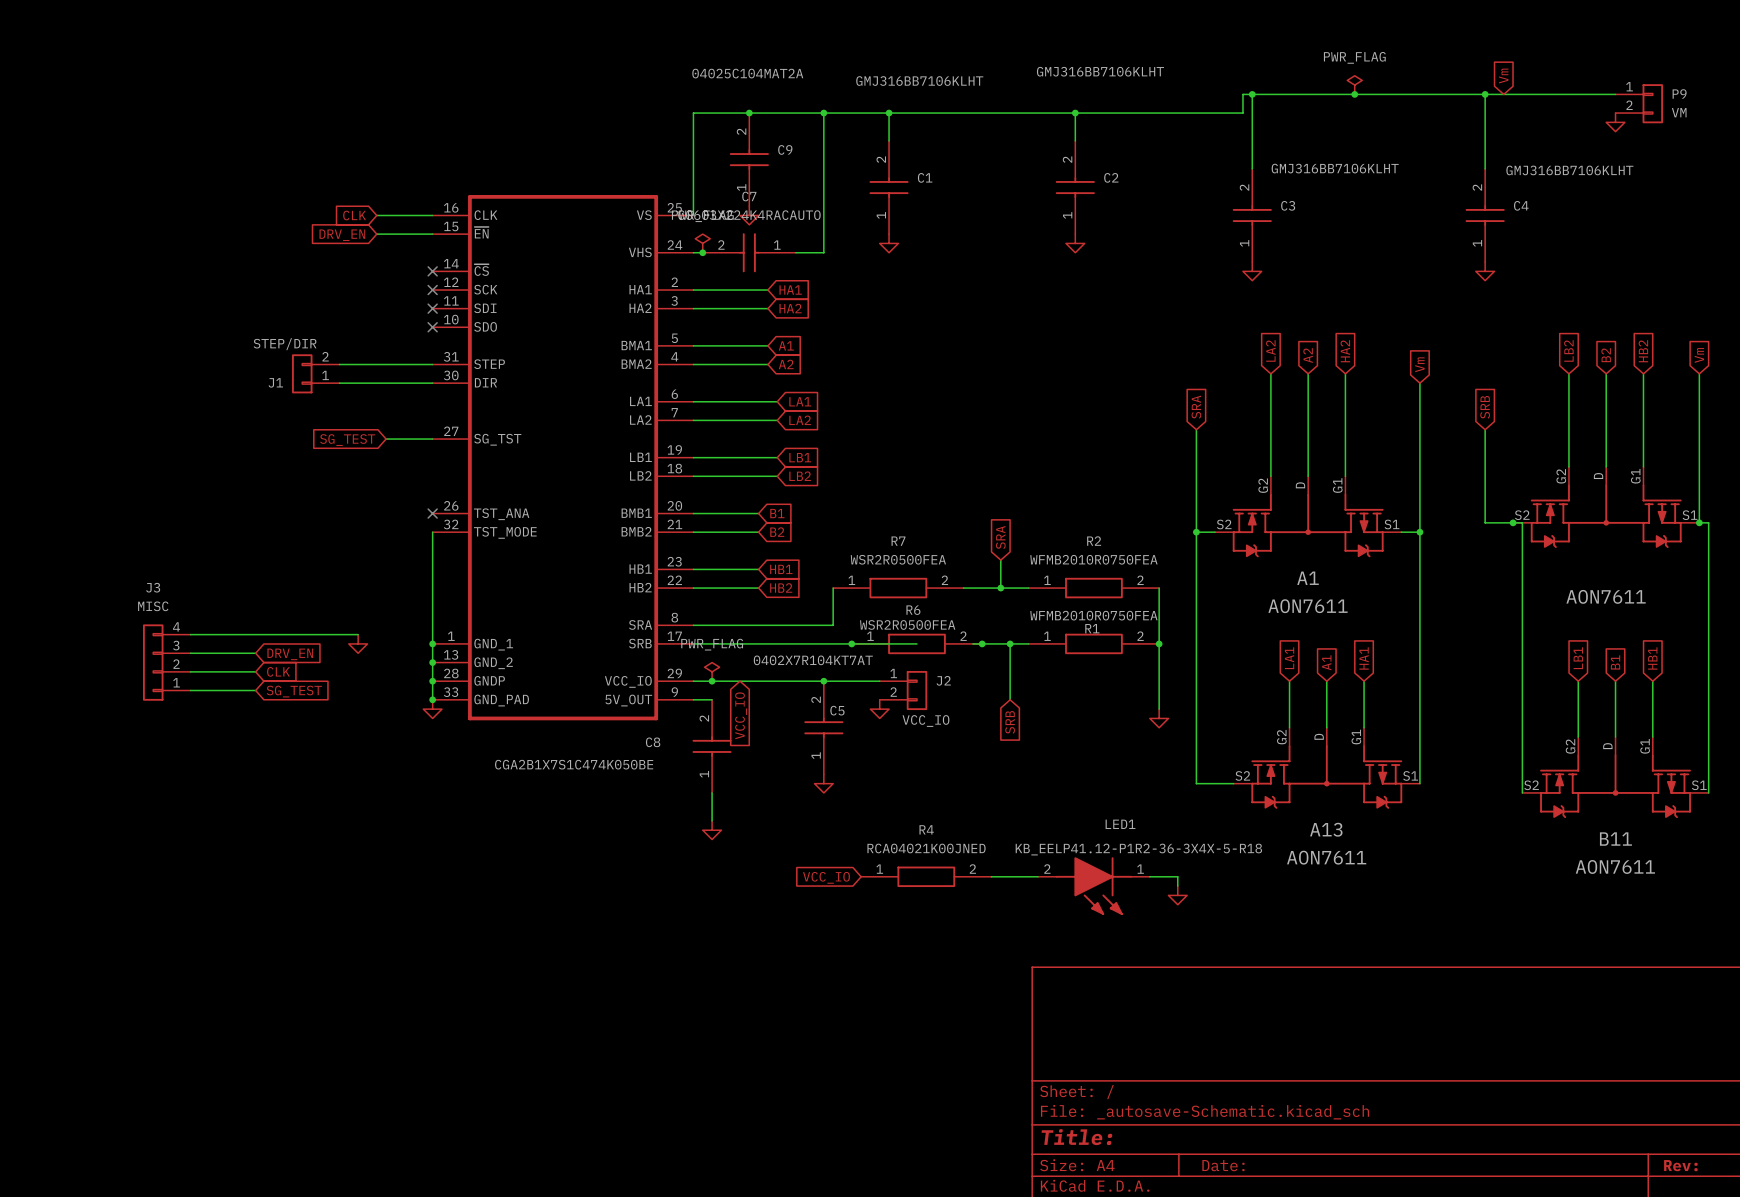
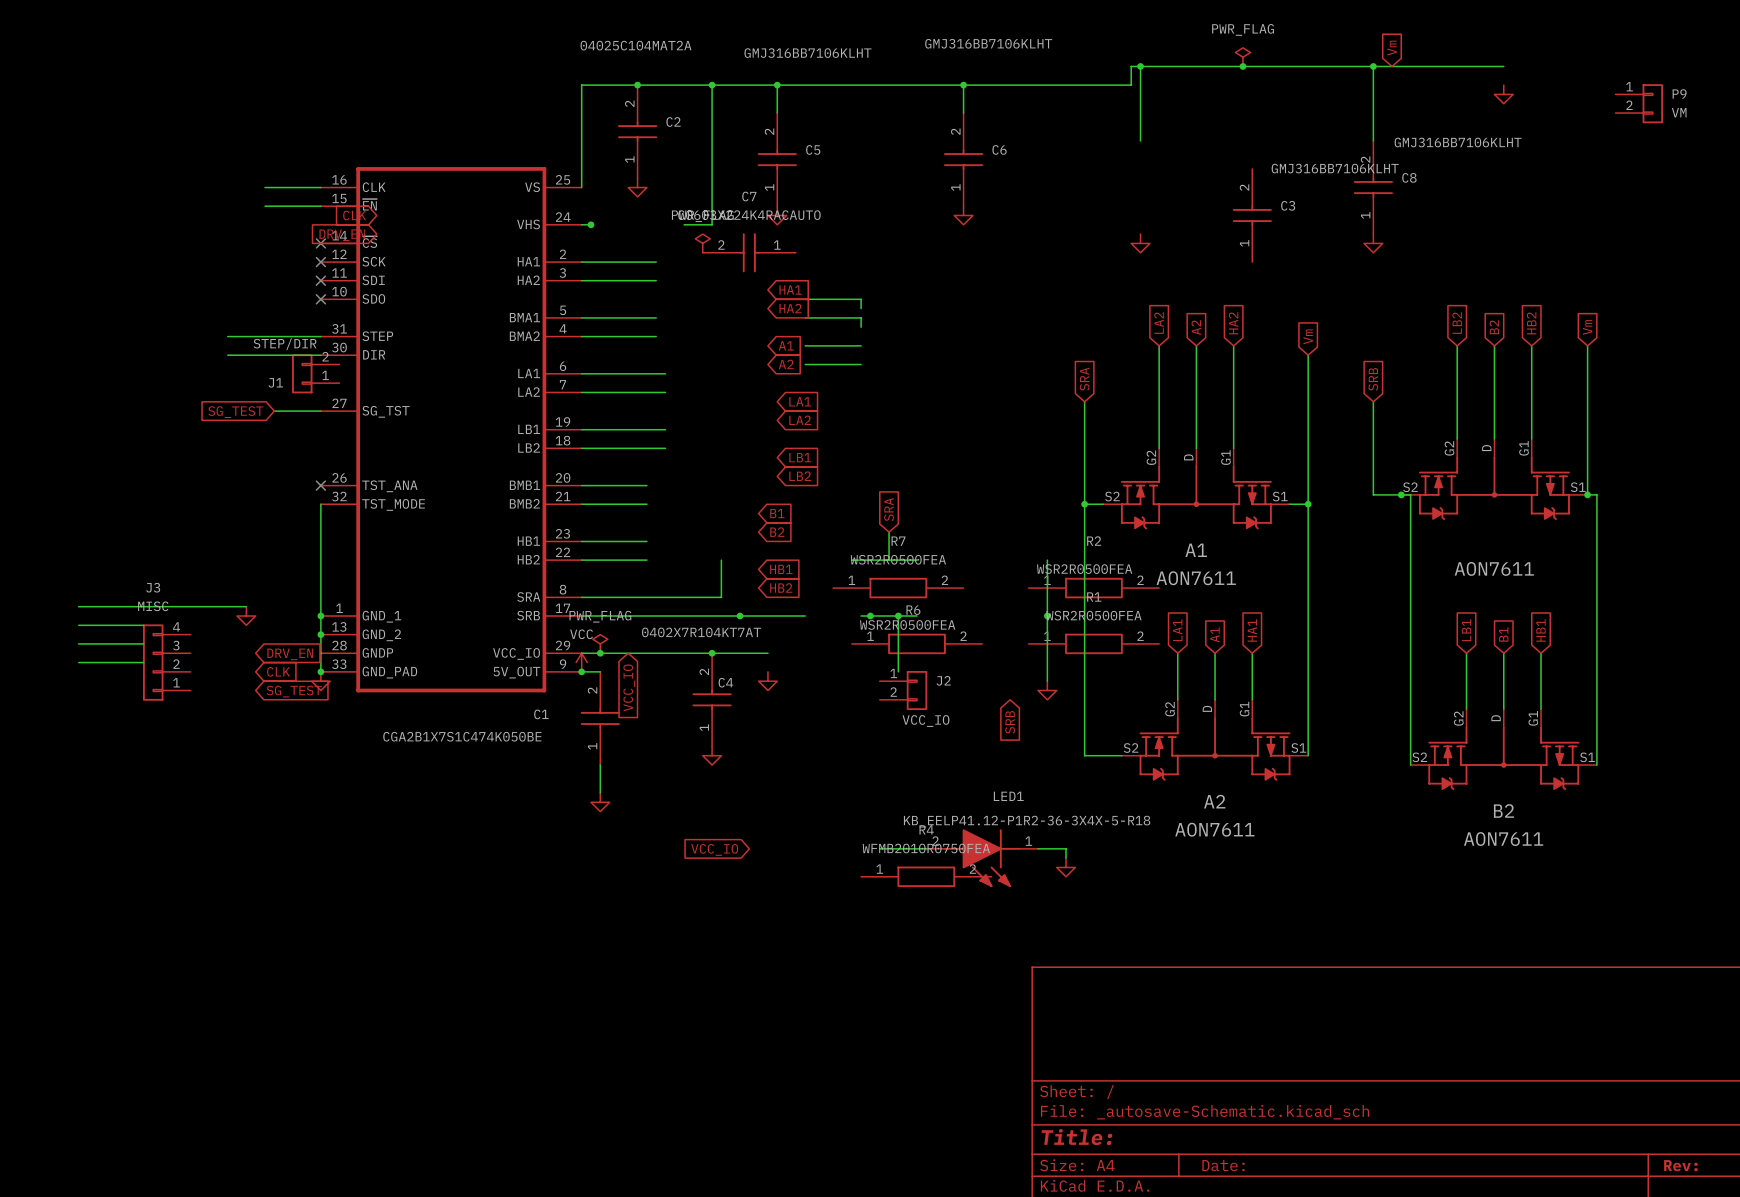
junction: none -> (1140, 66)
C2 value: GMJ316BB7106KLHT (1100, 71) -> 04025C104MAT2A (636, 45)
global label position: Vm (1503, 76) -> Vm (1392, 48)
C1 value: GMJ316BB7106KLHT (919, 81) -> CGA2B1X7S1C474K050BE (462, 736)
junction: none -> (637, 85)
junction: none -> (712, 85)
junction: none -> (777, 85)
junction: none -> (963, 85)
power symbol position: PWR_FLAG (1354, 85) -> PWR_FLAG (1242, 57)
wire: (1252, 94) (1252, 168) -> (1140, 66) (1140, 140)
junction position: (1252, 94) -> (1242, 66)
junction position: (1354, 94) -> (1373, 66)
wire: (1485, 94) (1485, 168) -> (1373, 66) (1373, 140)
junction: (1485, 94) -> none
power symbol: none -> (1503, 94)
wire: (1615, 94) (1242, 94) (1242, 113) (693, 113) (693, 215) -> (1503, 66) (1131, 66) (1131, 85) (581, 85) (581, 187)
junction: (749, 113) -> none
wire: (823, 113) (823, 252) (795, 252) -> (712, 85) (712, 224) (684, 224)
junction: (823, 113) -> none
wire: (889, 113) (889, 140) -> (777, 85) (777, 113)
junction: (889, 113) -> none
wire: (1075, 113) (1075, 140) -> (963, 85) (963, 113)
junction: (1075, 113) -> none
power symbol: (1615, 122) -> none
C9: 04025C104MAT2A (749, 159) -> none
C6: none -> GMJ316BB7106KLHT (963, 159)
C4 value: GMJ316BB7106KLHT (1569, 170) -> 0402X7R104KT7AT (701, 632)
C1 name position: C1 (925, 177) -> C1 (541, 714)
power symbol: none -> (637, 187)
C1 position: (889, 187) -> (600, 718)
C2 position: (1075, 187) -> (637, 131)
C4 name position: C4 (1521, 205) -> C4 (725, 682)
wire: (376, 215) (432, 215) -> (265, 187) (320, 187)
power symbol position: (749, 215) -> (777, 215)
power symbol: none -> (963, 215)
C4 position: (1485, 215) -> (712, 699)
junction: none -> (590, 224)
wire: (376, 234) (432, 234) -> (265, 206) (320, 206)
no-connect mark: none -> (320, 243)
power symbol: (889, 243) -> none
power symbol: (1075, 243) -> none
power symbol: none -> (1140, 243)
power symbol: none -> (1373, 243)
wire: (693, 252) (702, 252) -> (581, 224) (590, 224)
junction: (702, 252) -> none
no-connect mark: none -> (320, 262)
no-connect mark: (432, 271) -> none
power symbol: (1252, 271) -> none
power symbol: (1485, 271) -> none
no-connect mark: none -> (320, 280)
no-connect mark: (432, 290) -> none
wire: (693, 290) (767, 290) -> (581, 262) (656, 262)
no-connect mark: none -> (320, 299)
wire: none -> (805, 299) (861, 299) (861, 308)
no-connect mark: (432, 308) -> none
wire: (693, 308) (767, 308) -> (581, 280) (656, 280)
wire: none -> (805, 317) (861, 317) (861, 327)
no-connect mark: (432, 327) -> none
global label: none -> Vm (1587, 327)
global label: none -> Vm (1308, 336)
wire: (693, 345) (767, 345) -> (581, 317) (656, 317)
wire: none -> (805, 345) (861, 345)
wire: none -> (1196, 345) (1196, 429)
global label position: LA2 (1270, 350) -> LA2 (1159, 323)
global label position: LB2 (1568, 350) -> LB2 (1457, 323)
global label position: HA2 (1345, 351) -> HA2 (1233, 323)
global label position: HB2 (1643, 351) -> HB2 (1531, 323)
wire: none -> (1308, 355) (1308, 373)
global label position: A2 (1308, 355) -> A2 (1196, 327)
global label position: B2 (1606, 355) -> B2 (1494, 327)
global label: Vm (1699, 355) -> none
wire: (339, 364) (432, 364) -> (227, 336) (320, 336)
wire: (693, 364) (767, 364) -> (581, 336) (656, 336)
wire: none -> (805, 364) (861, 364)
global label: Vm (1419, 364) -> none
wire: (1270, 373) (1270, 476) -> (1159, 345) (1159, 448)
wire: (1345, 373) (1345, 476) -> (1233, 345) (1233, 448)
wire: (1568, 373) (1568, 466) -> (1457, 345) (1457, 439)
wire: (1606, 373) (1606, 466) -> (1494, 345) (1494, 439)
wire: (1643, 373) (1643, 466) -> (1531, 345) (1531, 439)
wire: (1699, 373) (1699, 522) (1708, 522) (1708, 792) -> (1587, 345) (1587, 494) (1596, 494) (1596, 765)
global label: none -> SRA (1084, 379)
wire: (339, 383) (432, 383) -> (227, 355) (320, 355)
wire: (1419, 383) (1419, 783) -> none
wire: (693, 401) (777, 401) -> (581, 373) (665, 373)
wire: none -> (1084, 401) (1084, 755) (1121, 755)
global label: SRA (1196, 407) -> none
global label position: SRB (1485, 407) -> SRB (1373, 379)
wire: (693, 420) (777, 420) -> (581, 392) (665, 392)
wire: (1485, 429) (1485, 522) (1522, 522) (1522, 792) -> (1373, 401) (1373, 494) (1410, 494) (1410, 765)
wire: (386, 439) (432, 439) -> (274, 411) (320, 411)
global label position: SG_TEST (347, 440) -> SG_TEST (235, 412)
wire: (1196, 448) (1196, 783) (1233, 783) -> none
part position: (563, 457) -> (451, 429)
wire: (693, 457) (777, 457) -> (581, 429) (665, 429)
wire: (693, 476) (777, 476) -> (581, 448) (665, 448)
wire: none -> (1308, 476) (1308, 755)
no-connect mark: none -> (320, 485)
junction: none -> (1587, 494)
junction: none -> (1084, 504)
junction: none -> (1308, 504)
part position: (1606, 507) -> (1494, 479)
global label: none -> SRA (889, 509)
no-connect mark: (432, 513) -> none
wire: (693, 513) (758, 513) -> (581, 485) (646, 485)
A1 position: (1308, 516) -> (1196, 488)
junction: (1513, 522) -> none
junction: (1699, 522) -> none
wire: (432, 532) (432, 699) -> (320, 504) (320, 671)
wire: (693, 532) (758, 532) -> (581, 504) (646, 504)
wire: (1196, 532) (1215, 532) -> (1084, 504) (1103, 504)
junction: (1196, 532) -> none
wire: (1401, 532) (1419, 532) -> (1289, 504) (1308, 504)
junction position: (1419, 532) -> (1401, 494)
global label: SRA (1000, 537) -> none
R2 value: WFMB2010R0750FEA (1093, 559) -> WSR2R0500FEA (1084, 569)
wire: (1000, 560) (1000, 588) -> (889, 532) (889, 560)
wire: (693, 569) (758, 569) -> (581, 541) (646, 541)
wire: (693, 588) (758, 588) -> (581, 560) (646, 560)
wire: (833, 588) (833, 625) (693, 625) -> (721, 560) (721, 597) (581, 597)
wire: (963, 588) (1028, 588) -> (851, 560) (916, 560)
junction: (1000, 588) -> none
wire: (1159, 588) (1159, 709) -> (1047, 560) (1047, 681)
R1 value: WFMB2010R0750FEA (1093, 615) -> WSR2R0500FEA (1093, 615)
power symbol: none -> (246, 616)
junction: none -> (320, 616)
junction: none -> (740, 616)
junction: none -> (870, 616)
junction: none -> (898, 616)
junction: none -> (1047, 616)
R1 name position: R1 (1092, 628) -> R1 (1094, 597)
wire: (190, 634) (358, 634) -> (78, 606) (246, 606)
junction: none -> (320, 634)
power symbol position: (358, 643) -> (320, 681)
junction: (432, 643) -> none
wire: (693, 643) (916, 643) -> (581, 616) (805, 616)
junction: (851, 643) -> none
wire: (972, 643) (1028, 643) -> (861, 616) (916, 616)
junction: (982, 643) -> none
wire: (1010, 643) (1010, 699) -> (898, 616) (898, 671)
junction: (1010, 643) -> none
junction: (1159, 643) -> none
wire: (190, 653) (255, 653) -> (78, 625) (143, 625)
junction: none -> (600, 653)
global label position: LA1 (1289, 658) -> LA1 (1177, 630)
global label position: HA1 (1364, 658) -> HA1 (1252, 630)
global label position: LB1 (1578, 658) -> LB1 (1466, 630)
global label position: HB1 (1652, 658) -> HB1 (1541, 630)
C5 value: 0402X7R104KT7AT (813, 660) -> GMJ316BB7106KLHT (808, 53)
junction: (432, 662) -> none
power symbol: none -> VCC (581, 662)
global label position: A1 (1326, 662) -> A1 (1215, 634)
global label position: B1 (1615, 662) -> B1 (1503, 634)
wire: (190, 671) (255, 671) -> (78, 643) (143, 643)
junction: none -> (320, 671)
junction: none -> (581, 671)
power symbol position: PWR_FLAG (712, 671) -> PWR_FLAG (600, 643)
junction: (432, 681) -> none
wire: (693, 681) (879, 681) -> (581, 653) (767, 653)
junction position: (712, 681) -> (712, 653)
power symbol: none -> (767, 681)
junction: (823, 681) -> none
wire: (1289, 681) (1289, 727) -> (1177, 653) (1177, 699)
wire: (1326, 681) (1326, 727) -> (1215, 653) (1215, 699)
wire: (1364, 681) (1364, 727) -> (1252, 653) (1252, 699)
wire: (1578, 681) (1578, 737) -> (1466, 653) (1466, 709)
wire: (1615, 681) (1615, 737) -> (1503, 653) (1503, 709)
wire: (1652, 681) (1652, 737) -> (1541, 653) (1541, 709)
global label: none -> VCC_IO (629, 687)
wire: (190, 690) (255, 690) -> (78, 662) (143, 662)
power symbol: none -> (1047, 690)
junction: (432, 699) -> none
wire: (693, 699) (712, 699) -> (581, 671) (600, 671)
power symbol: (432, 709) -> none
power symbol: (879, 709) -> none
C5 name position: C5 (837, 710) -> C5 (813, 149)
global label: VCC_IO (741, 715) -> none
power symbol: (1159, 718) -> none
C5 position: (823, 727) -> (777, 159)
A2: none -> AON7611 (1215, 740)
C8 name position: C8 (653, 742) -> C8 (1409, 177)
C8 position: (712, 746) -> (1373, 187)
B2: none -> AON7611 (1503, 749)
power symbol: none -> (712, 755)
C8 value: CGA2B1X7S1C474K050BE (574, 764) -> GMJ316BB7106KLHT (1458, 142)
A13: AON7611 (1326, 768) -> none
B11: AON7611 (1615, 777) -> none
power symbol: (823, 783) -> none
wire: (712, 792) (712, 820) -> (600, 765) (600, 792)
power symbol: none -> (600, 802)
power symbol: (712, 830) -> none
R4 value: RCA04021K00JNED (926, 848) -> WFMB2010R0750FEA (926, 848)
global label: none -> VCC_IO (714, 849)
power symbol: none -> (1066, 867)
wire: (991, 876) (1038, 876) -> (879, 848) (926, 848)
wire: (1149, 876) (1177, 876) (1177, 886) -> (1038, 848) (1066, 848) (1066, 858)
global label: VCC_IO (826, 877) -> none
LED1 position: (1093, 886) -> (982, 858)
power symbol: (1177, 895) -> none

